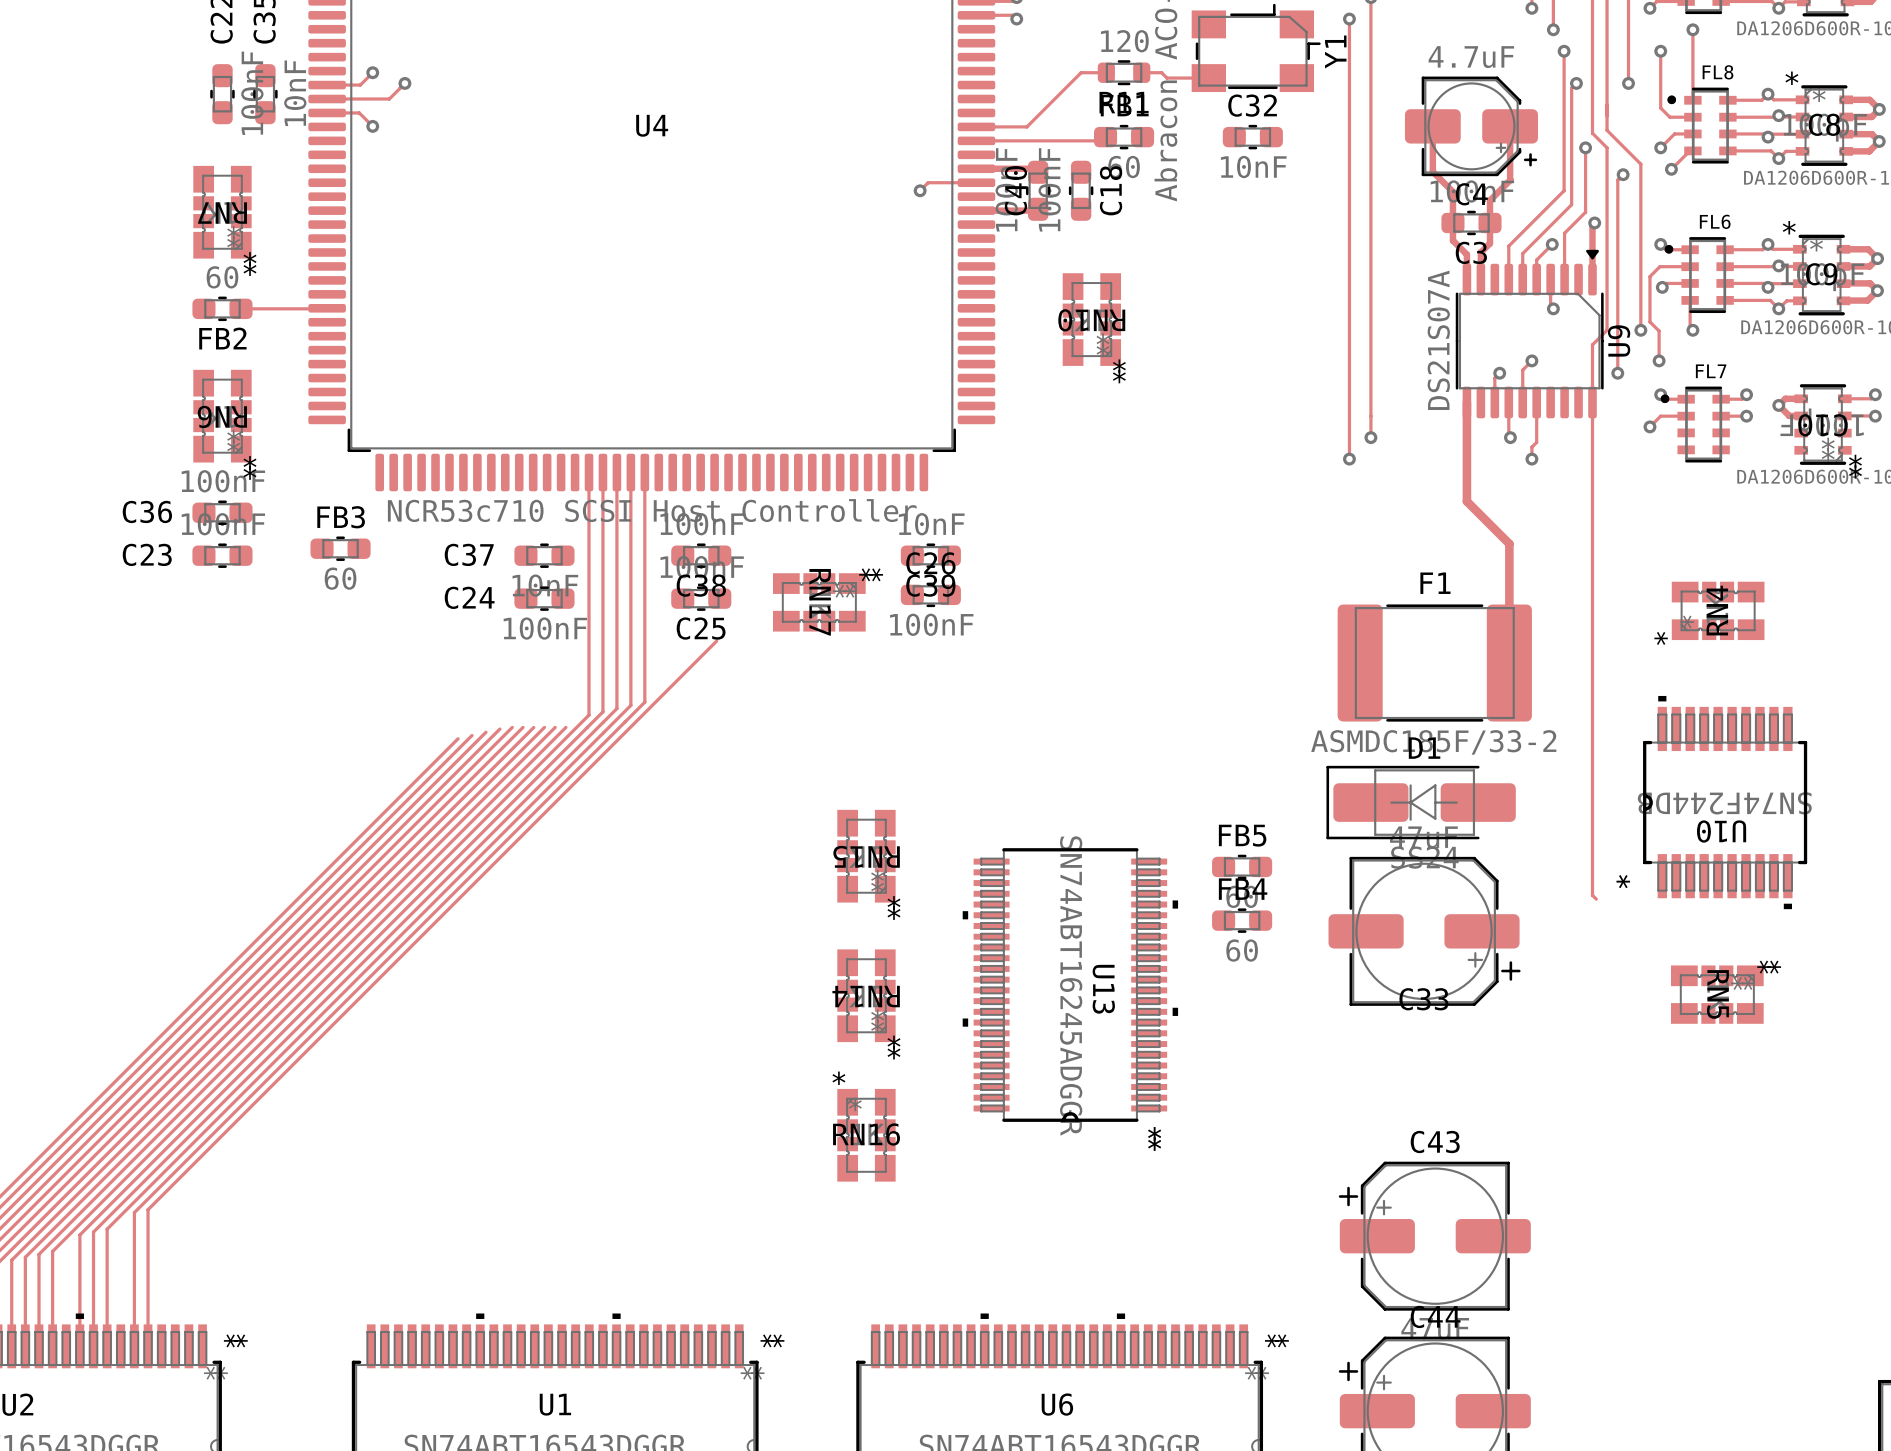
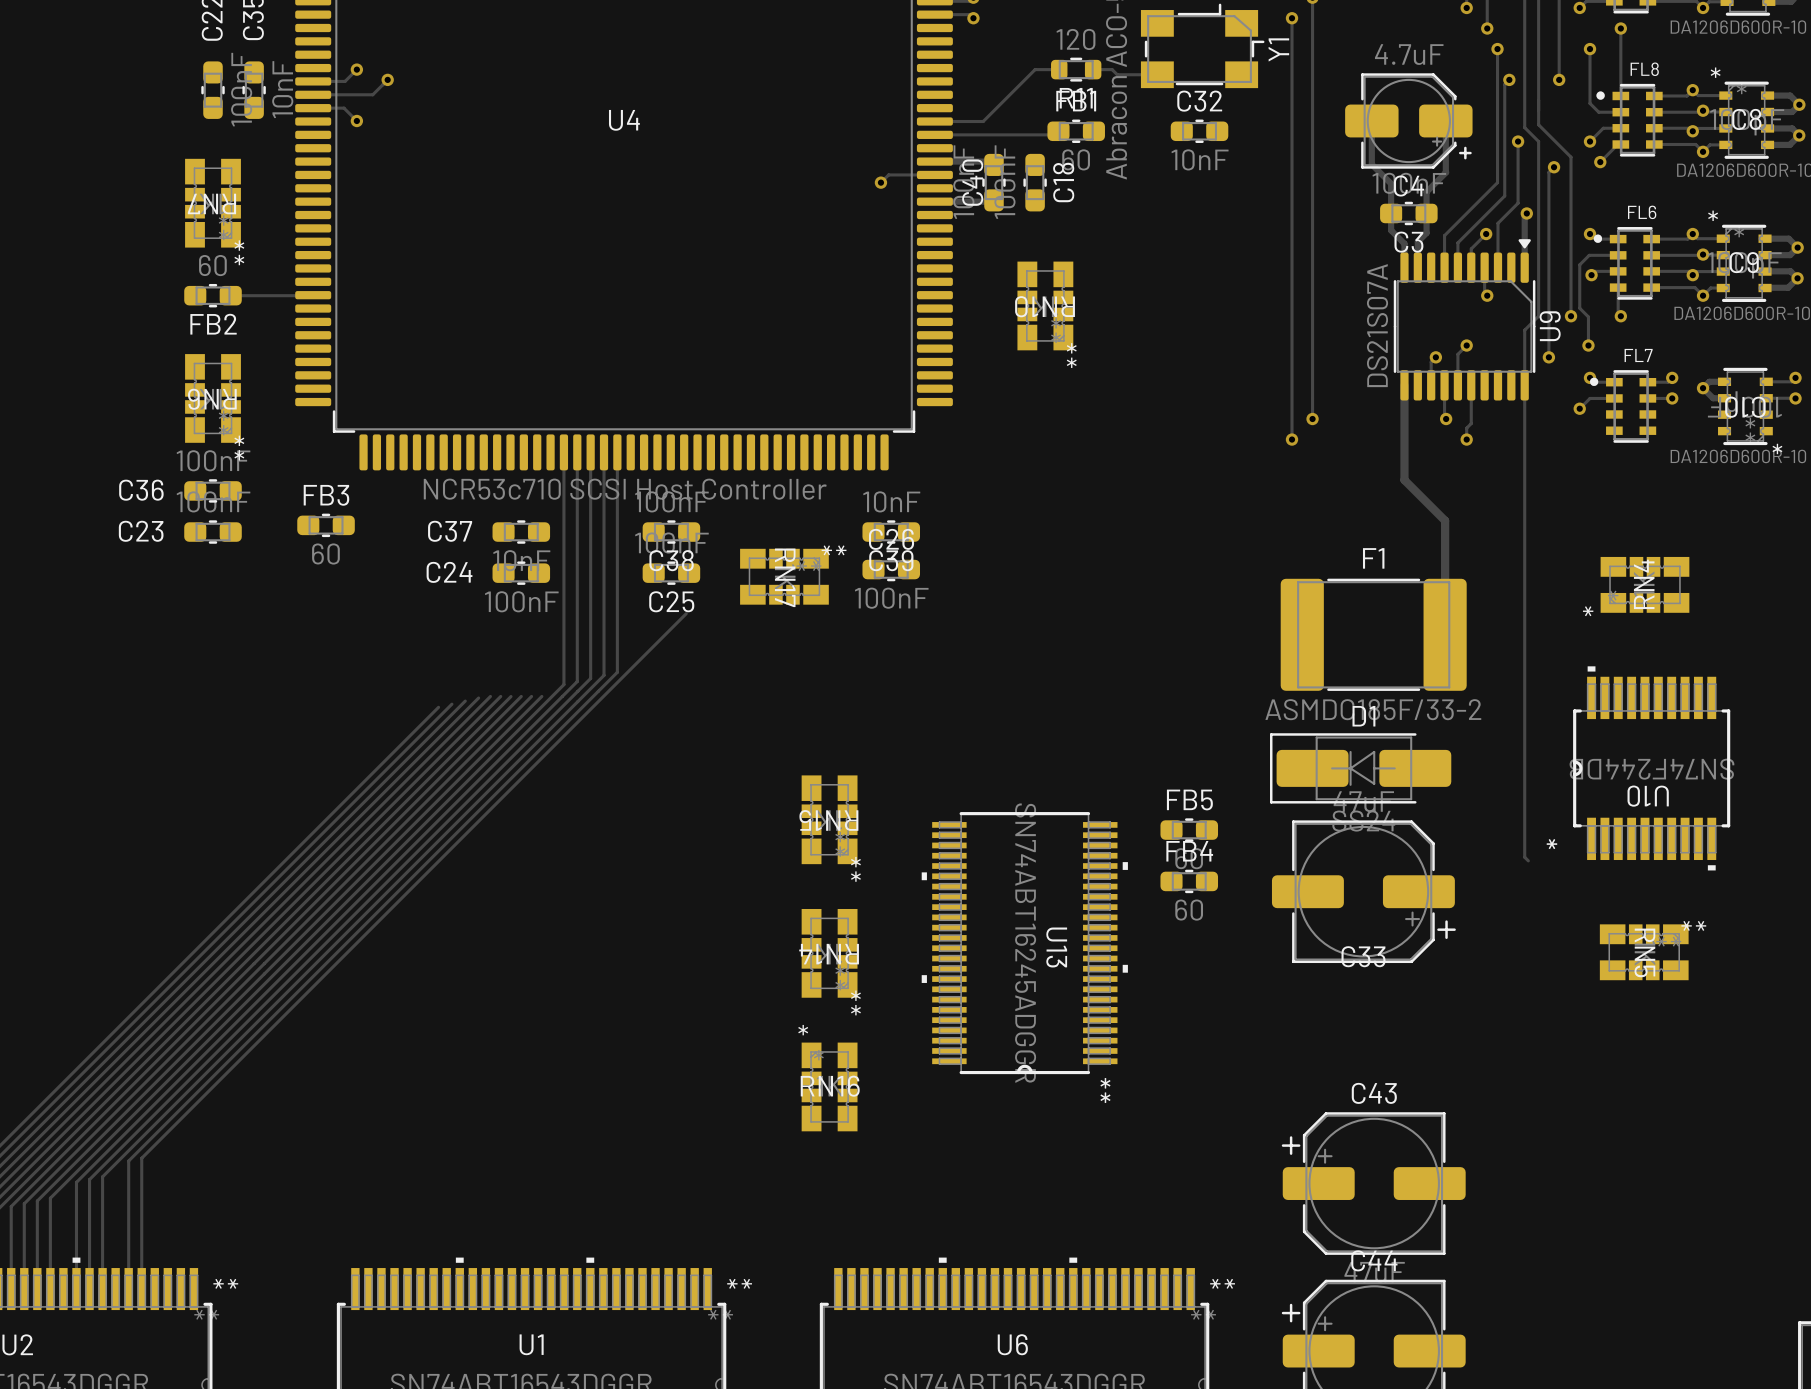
C10 footprint: [1794, 384, 1852, 465] -> [1718, 367, 1773, 446]

